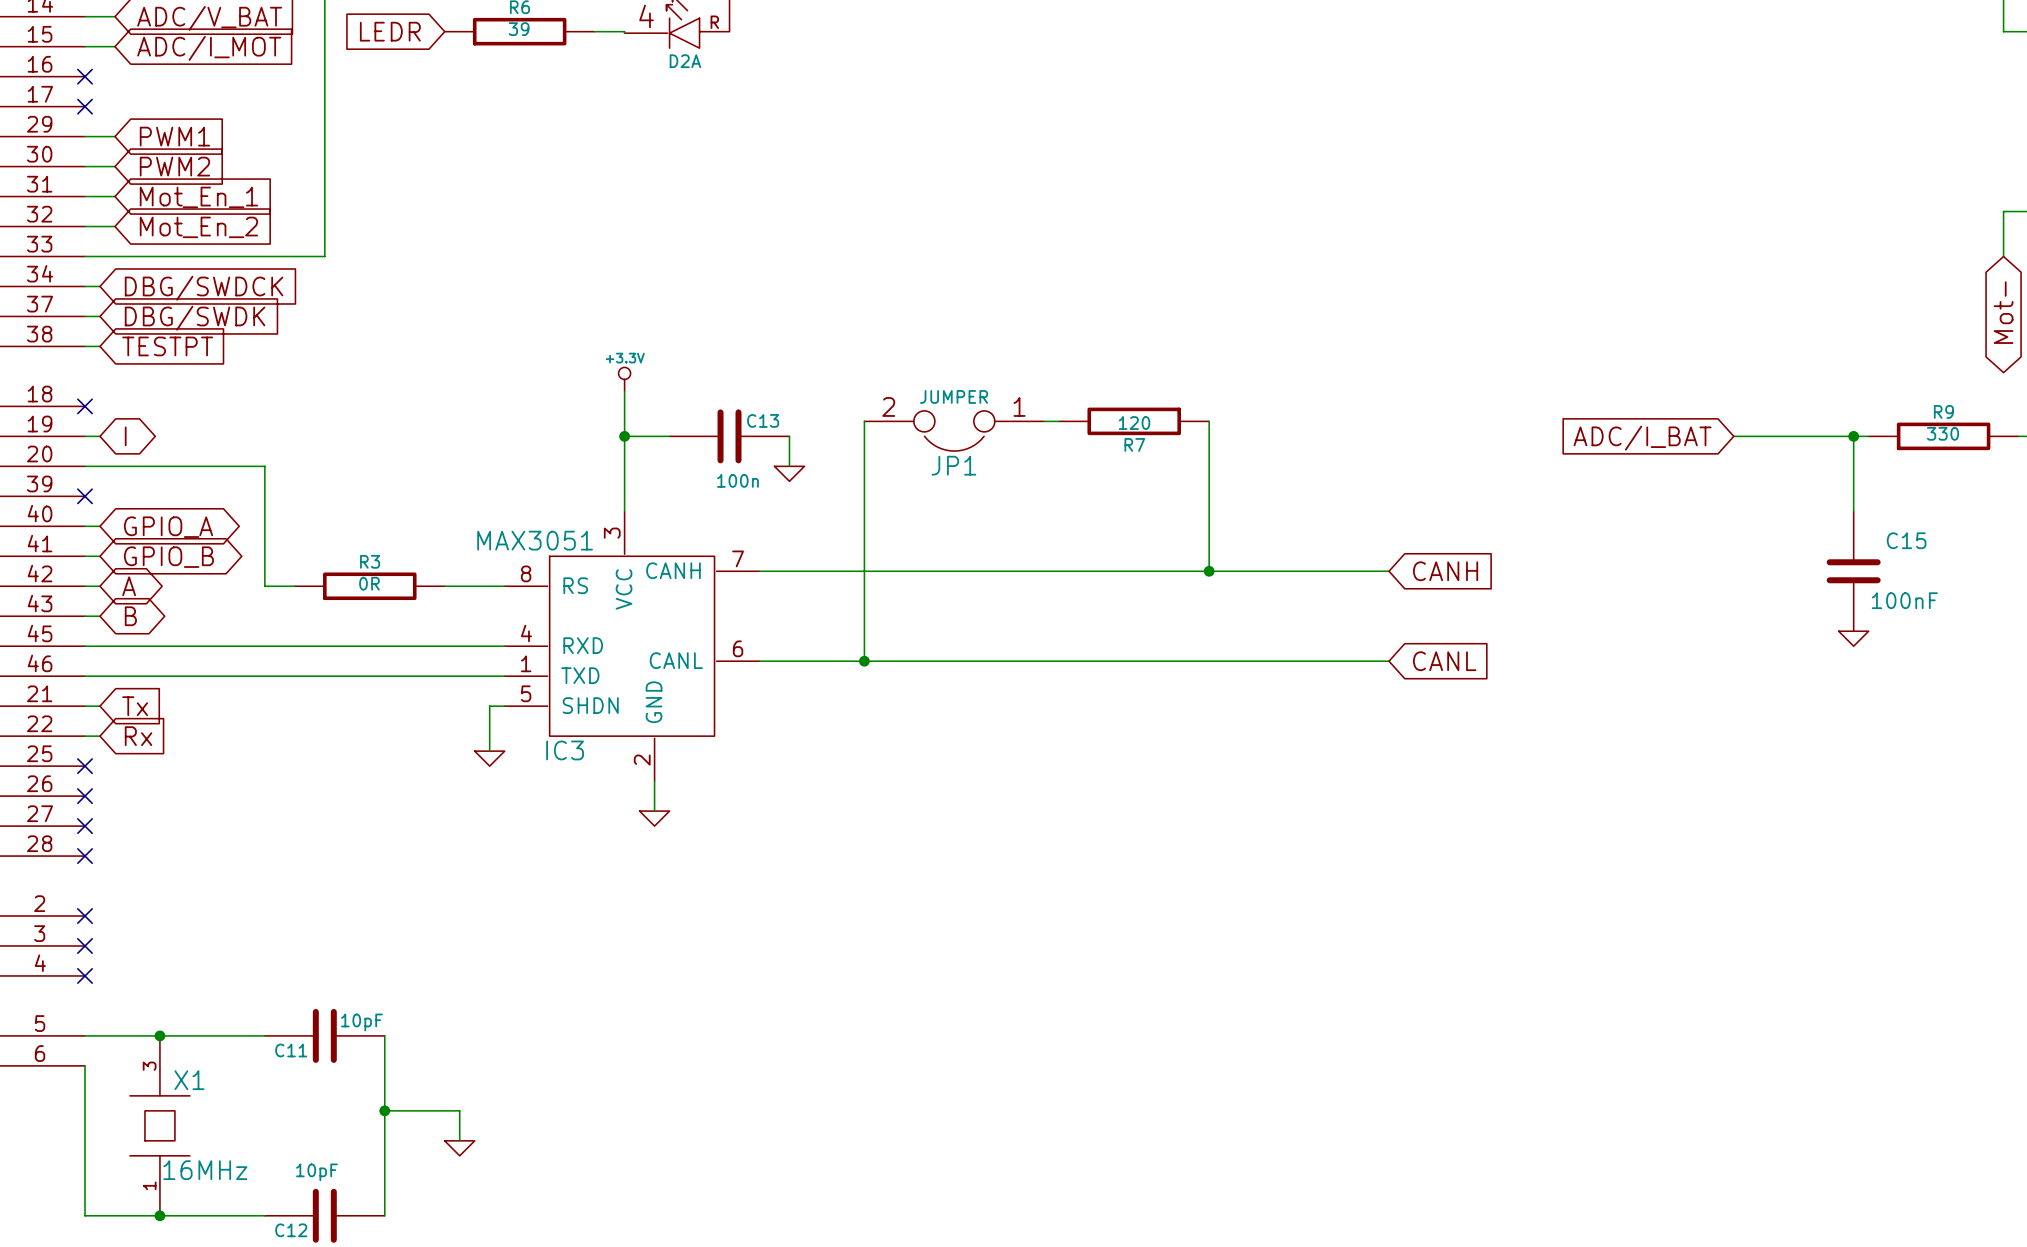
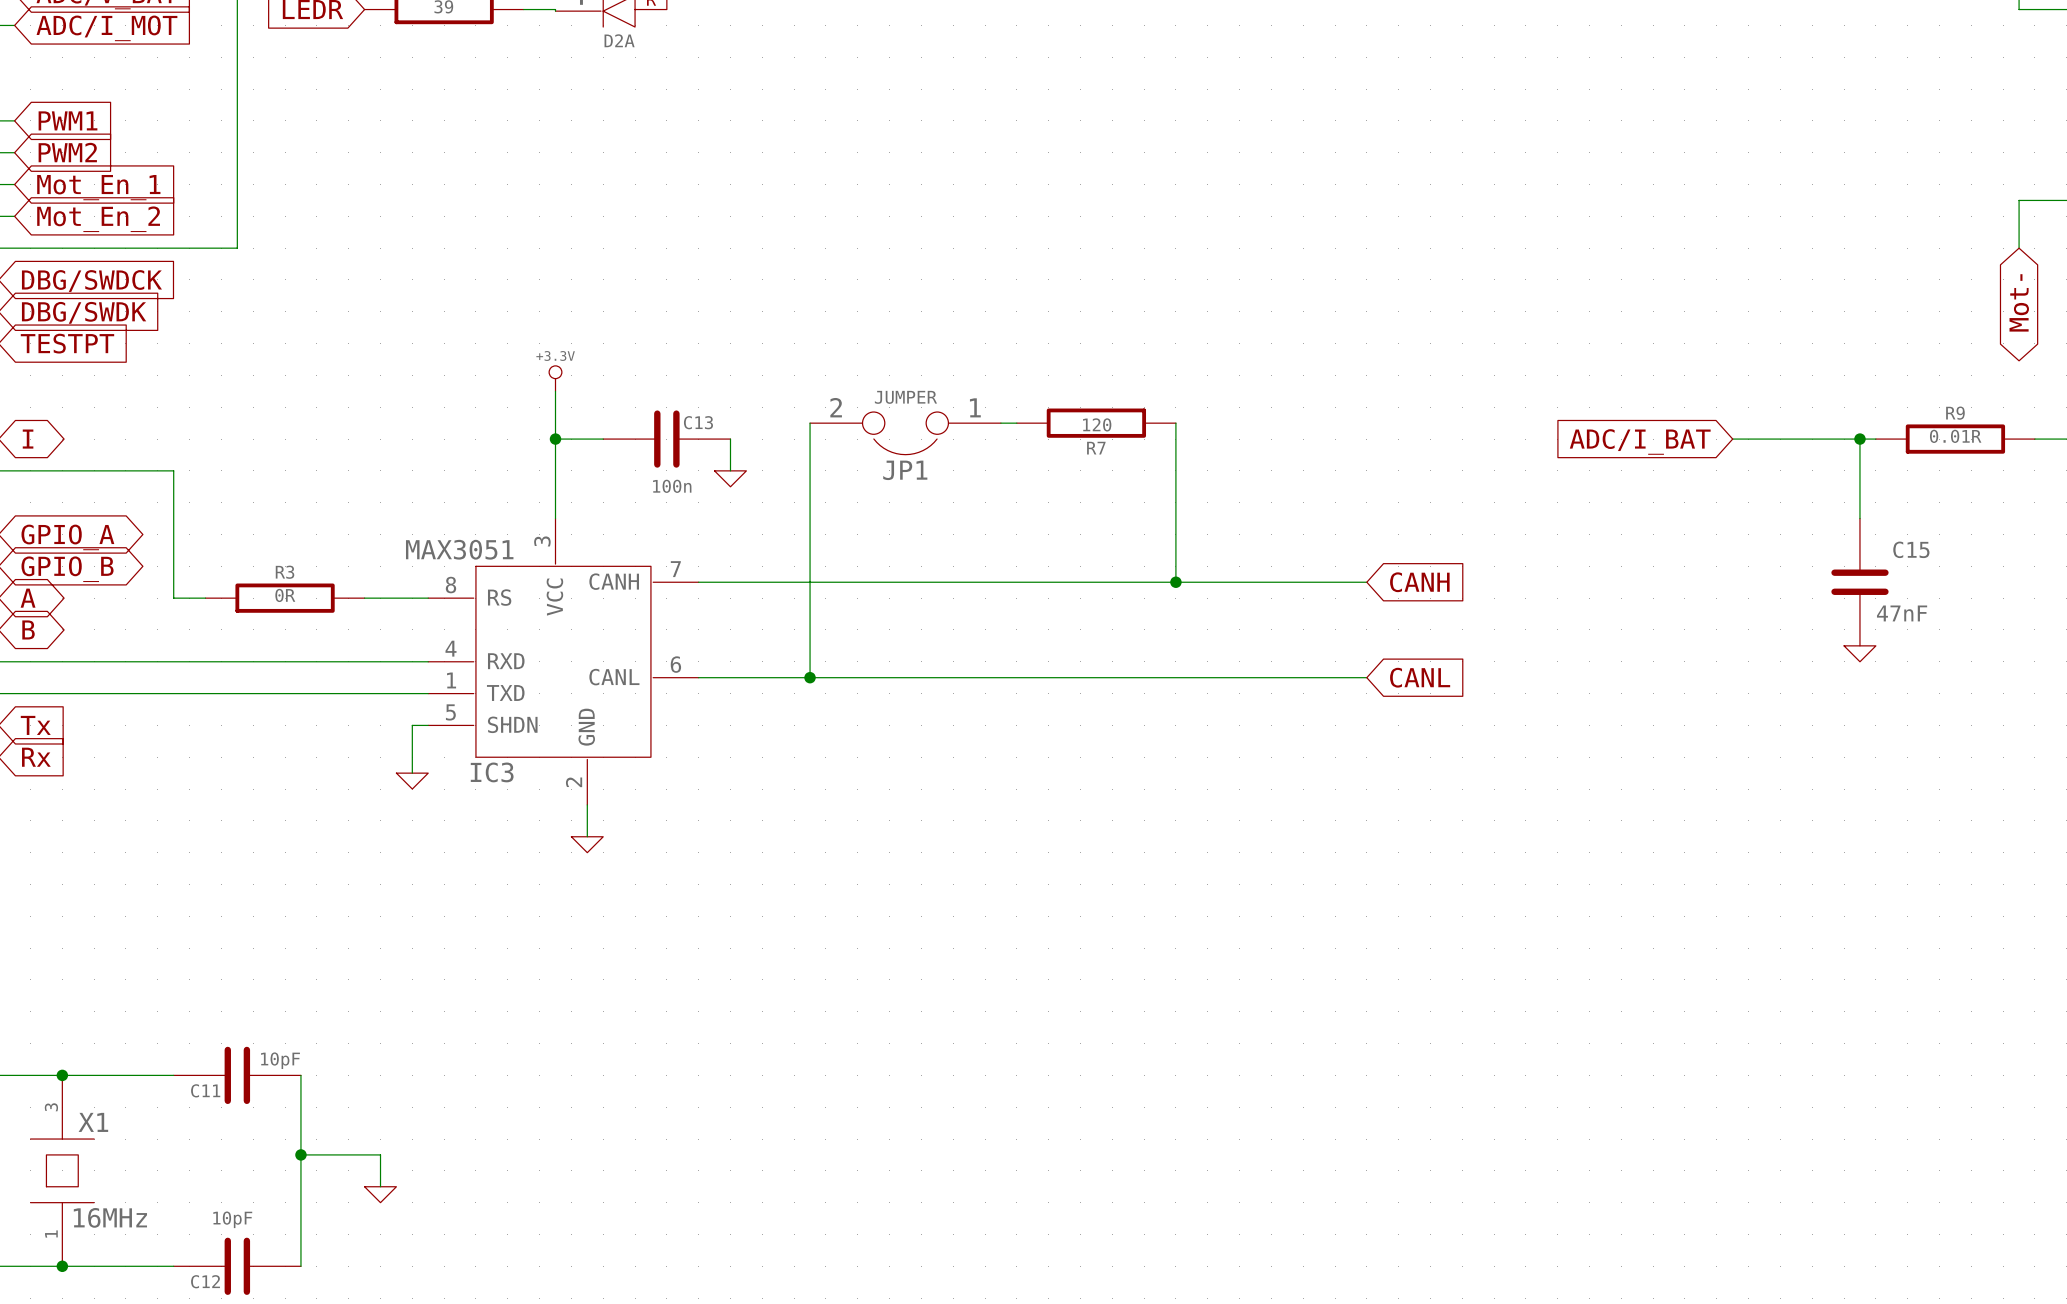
R9 value: 330 (1943, 433) -> 0.01R (1955, 436)
C15 value: 100nF (1904, 600) -> 47nF (1902, 613)

